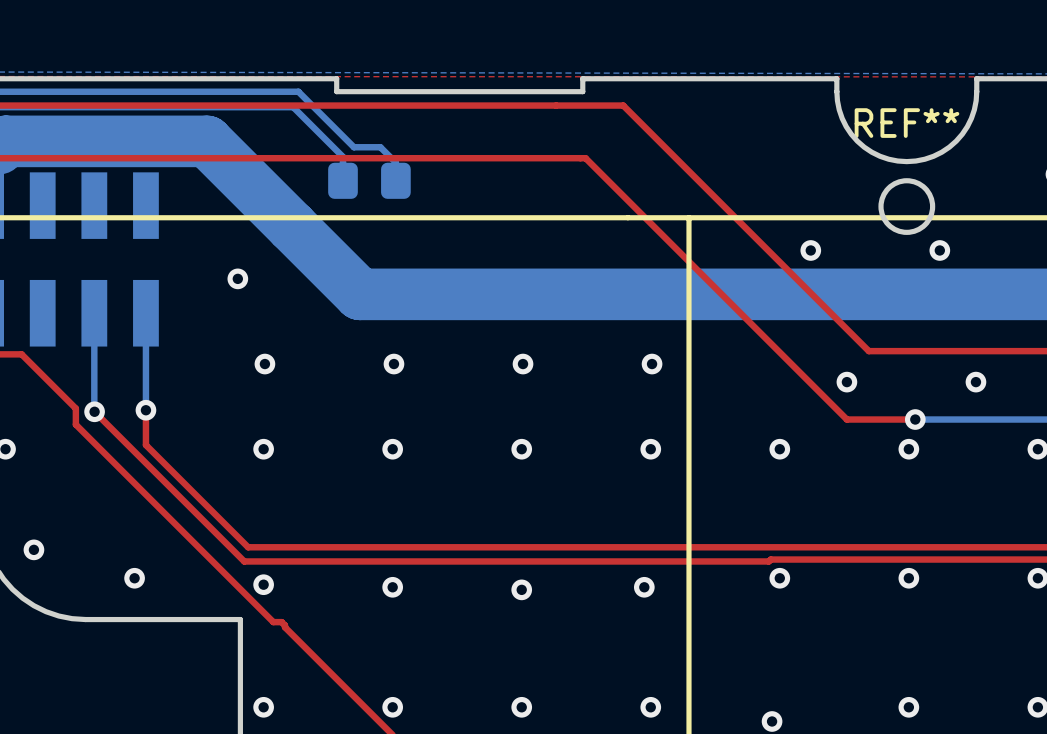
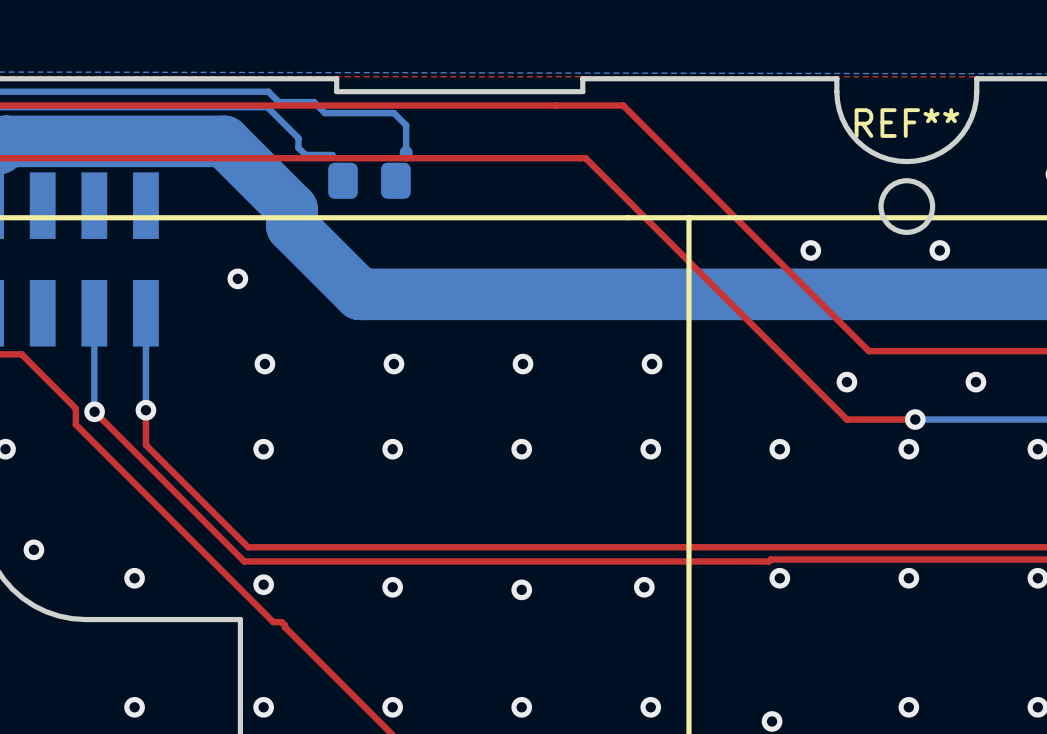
bottom track: (268, 91) (298, 91) (353, 147) (380, 147) (395, 162) (395, 180) -> (268, 91) (278, 102) (313, 102) (324, 113) (393, 113) (406, 125) (406, 154) (406, 152)
bottom track: (267, 107) (293, 107) (342, 156) (342, 180) -> (267, 107) (298, 138) (298, 147) (305, 154) (332, 154)
bottom track: (206, 141) (291, 226) -> (206, 141) (224, 141) (292, 209) (292, 226)
via: none -> (134, 707)

